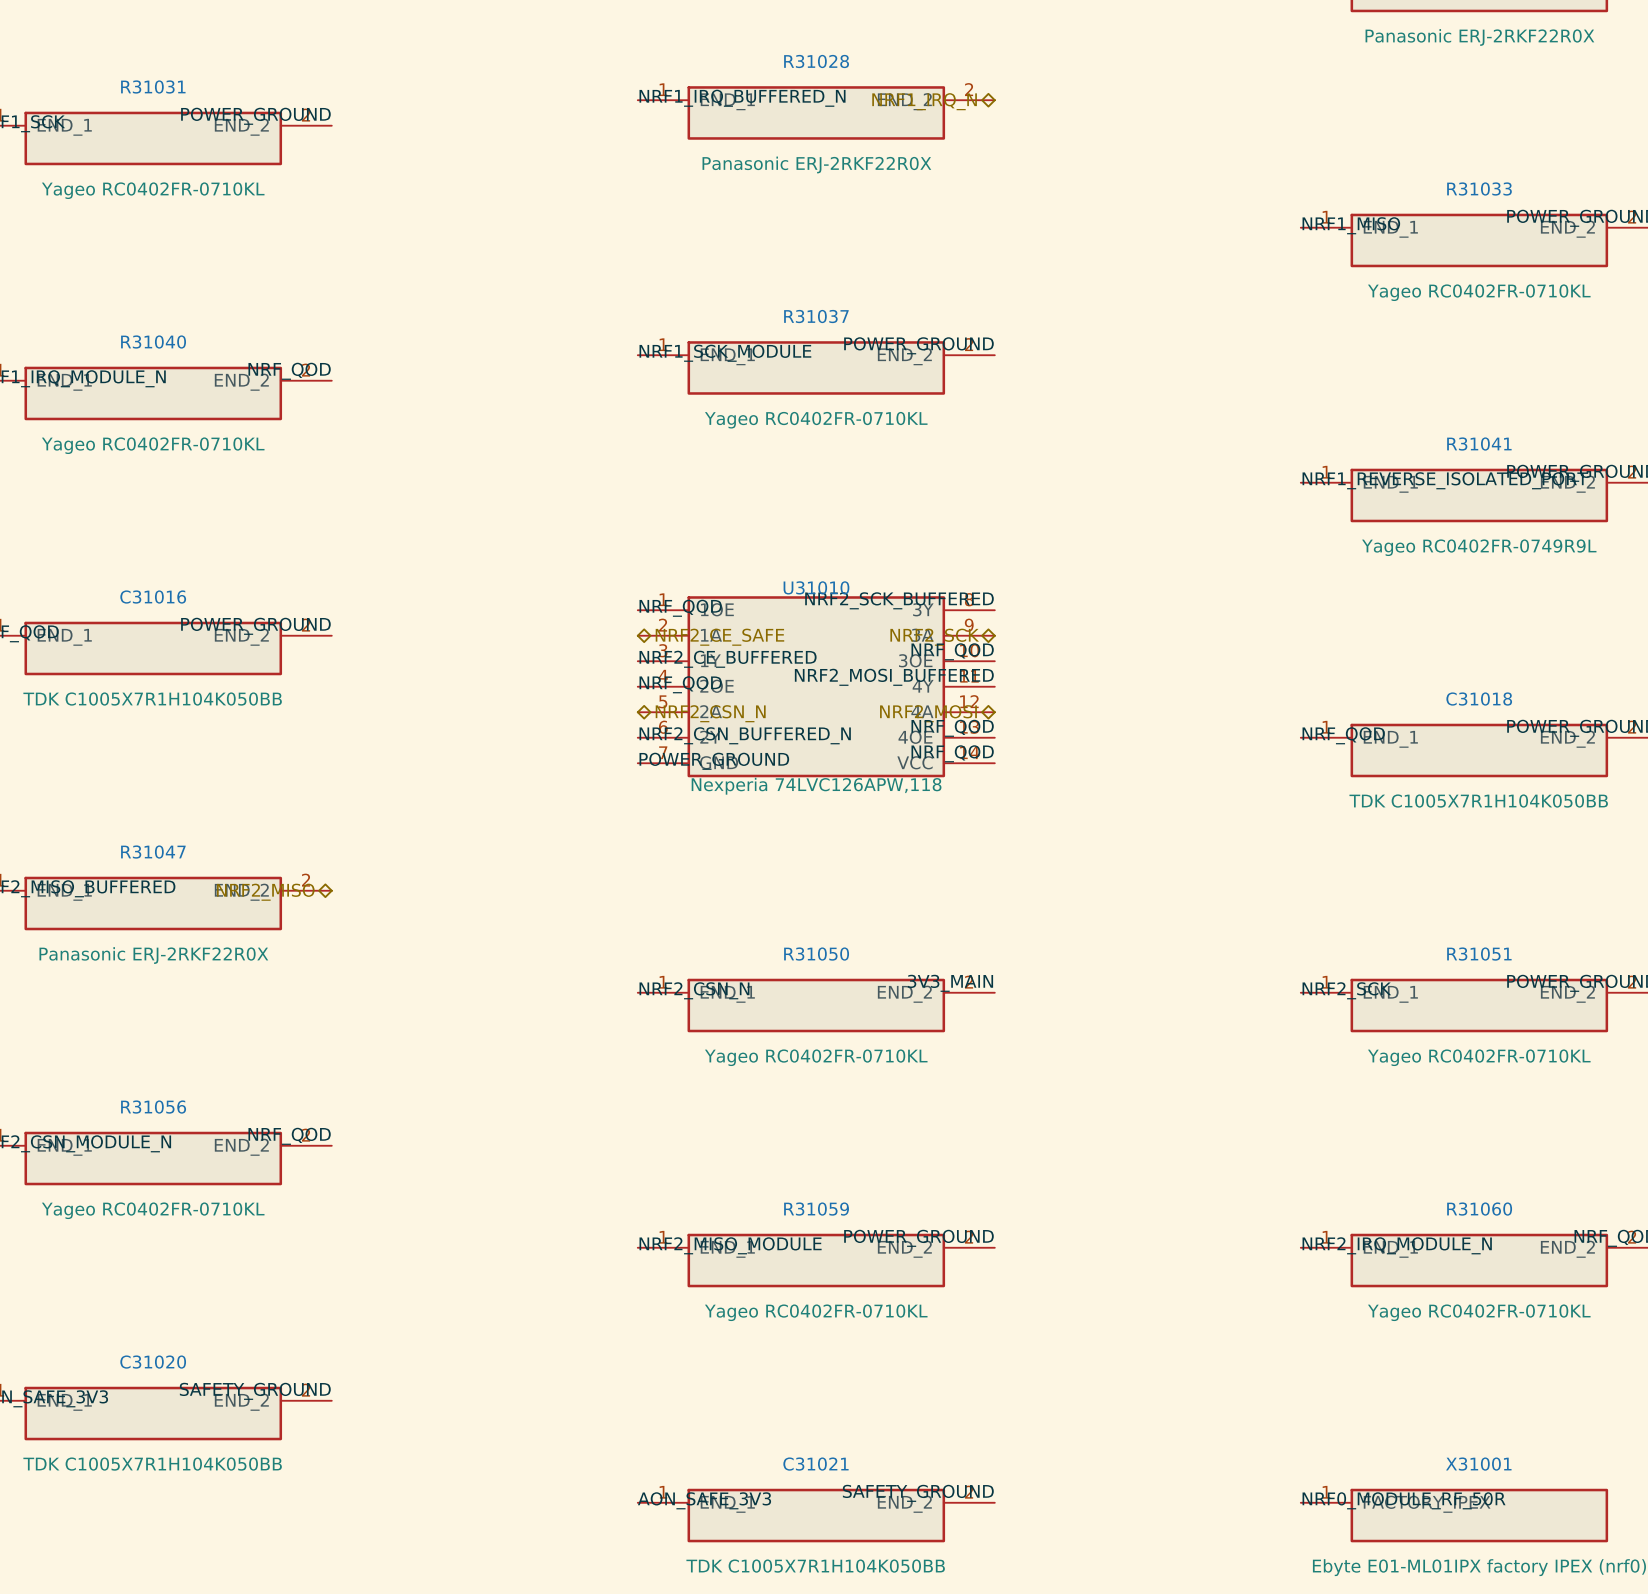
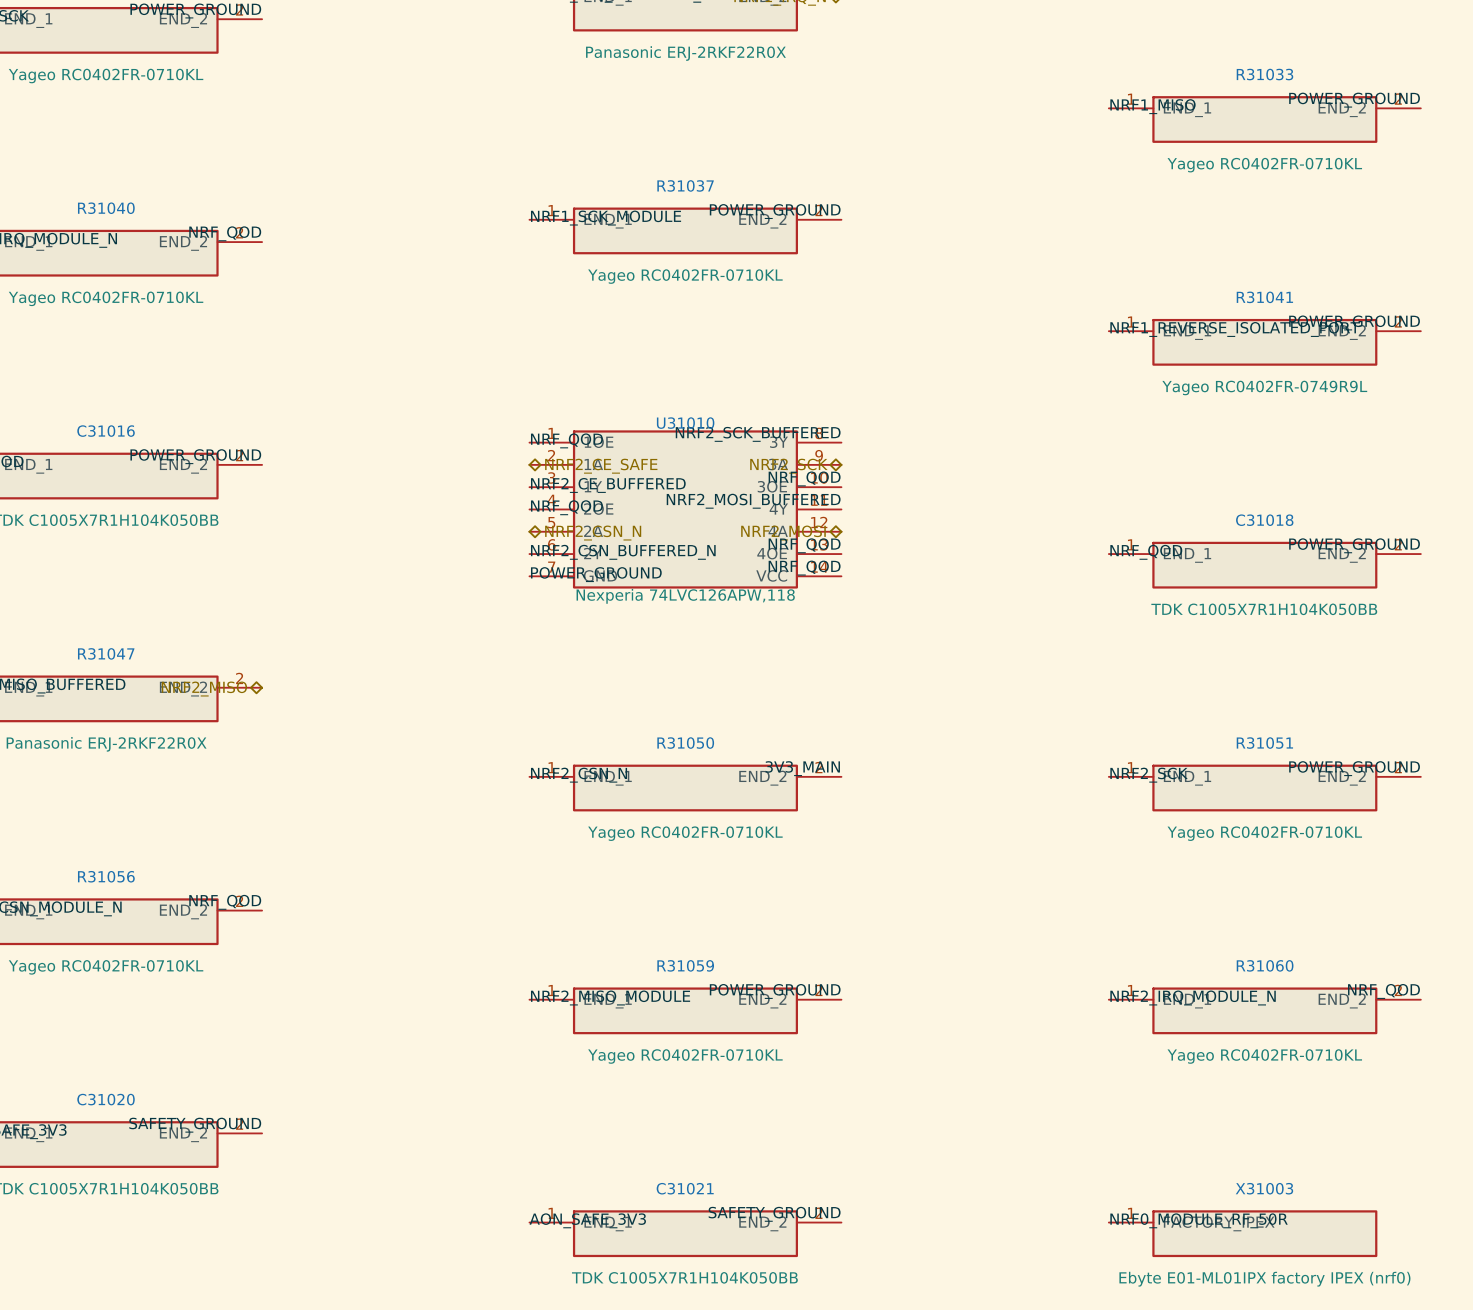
X31001 name: X31001 (1478, 1464) -> X31003 (1264, 1188)

